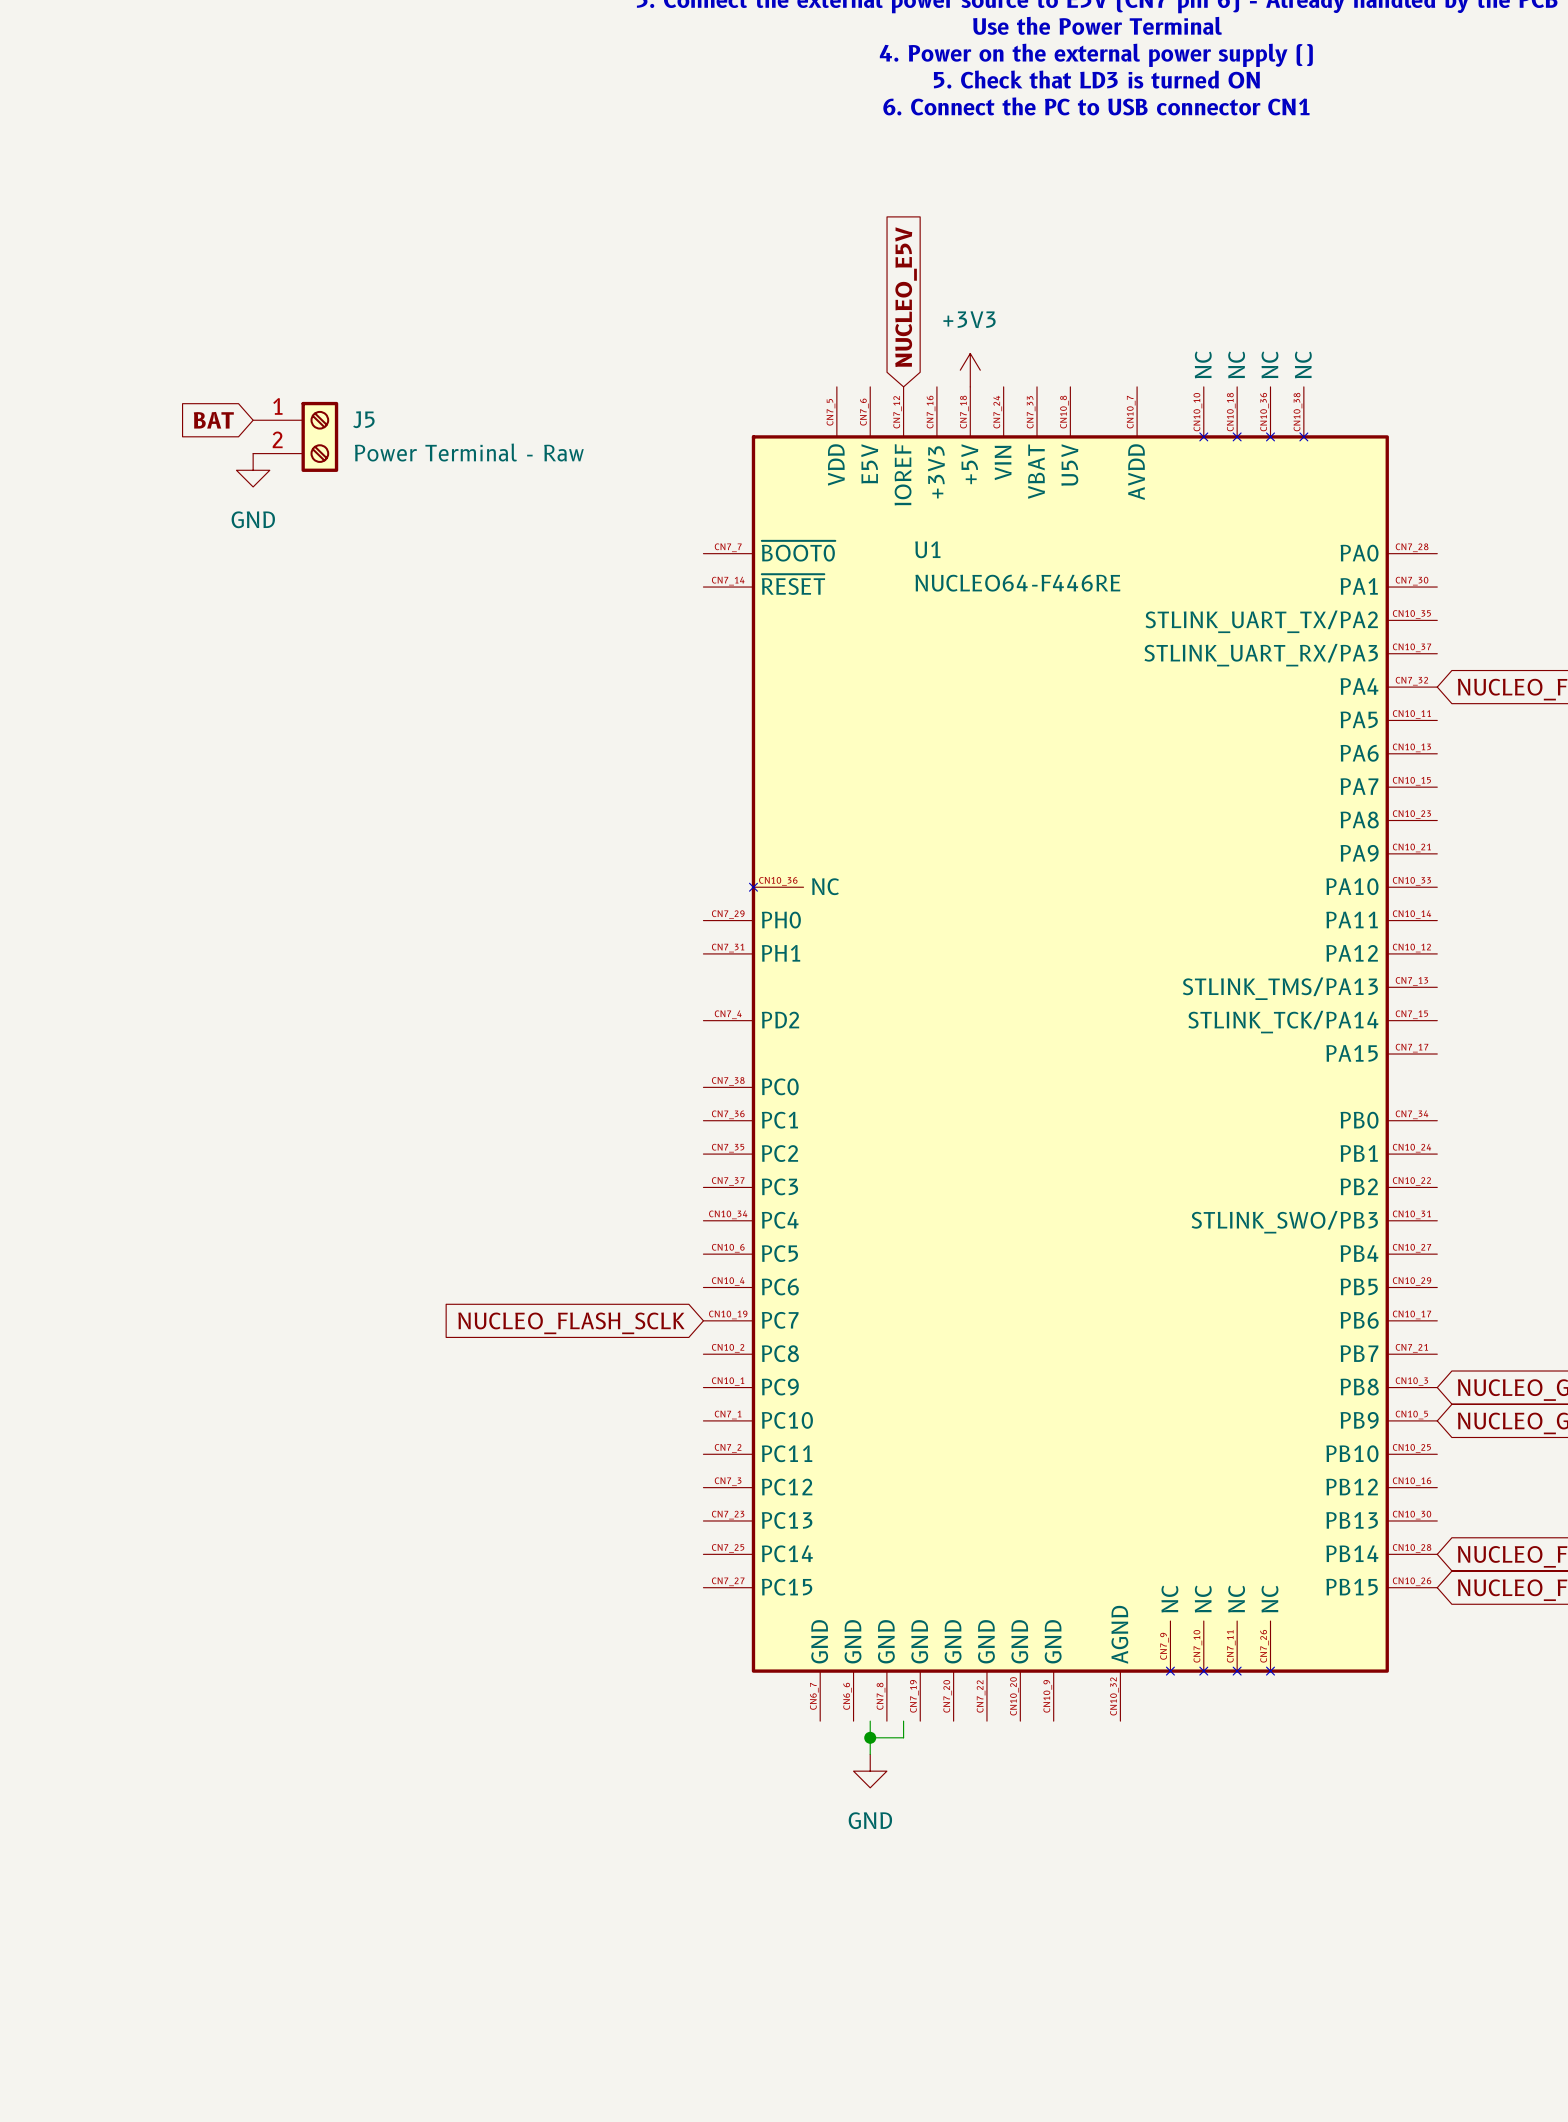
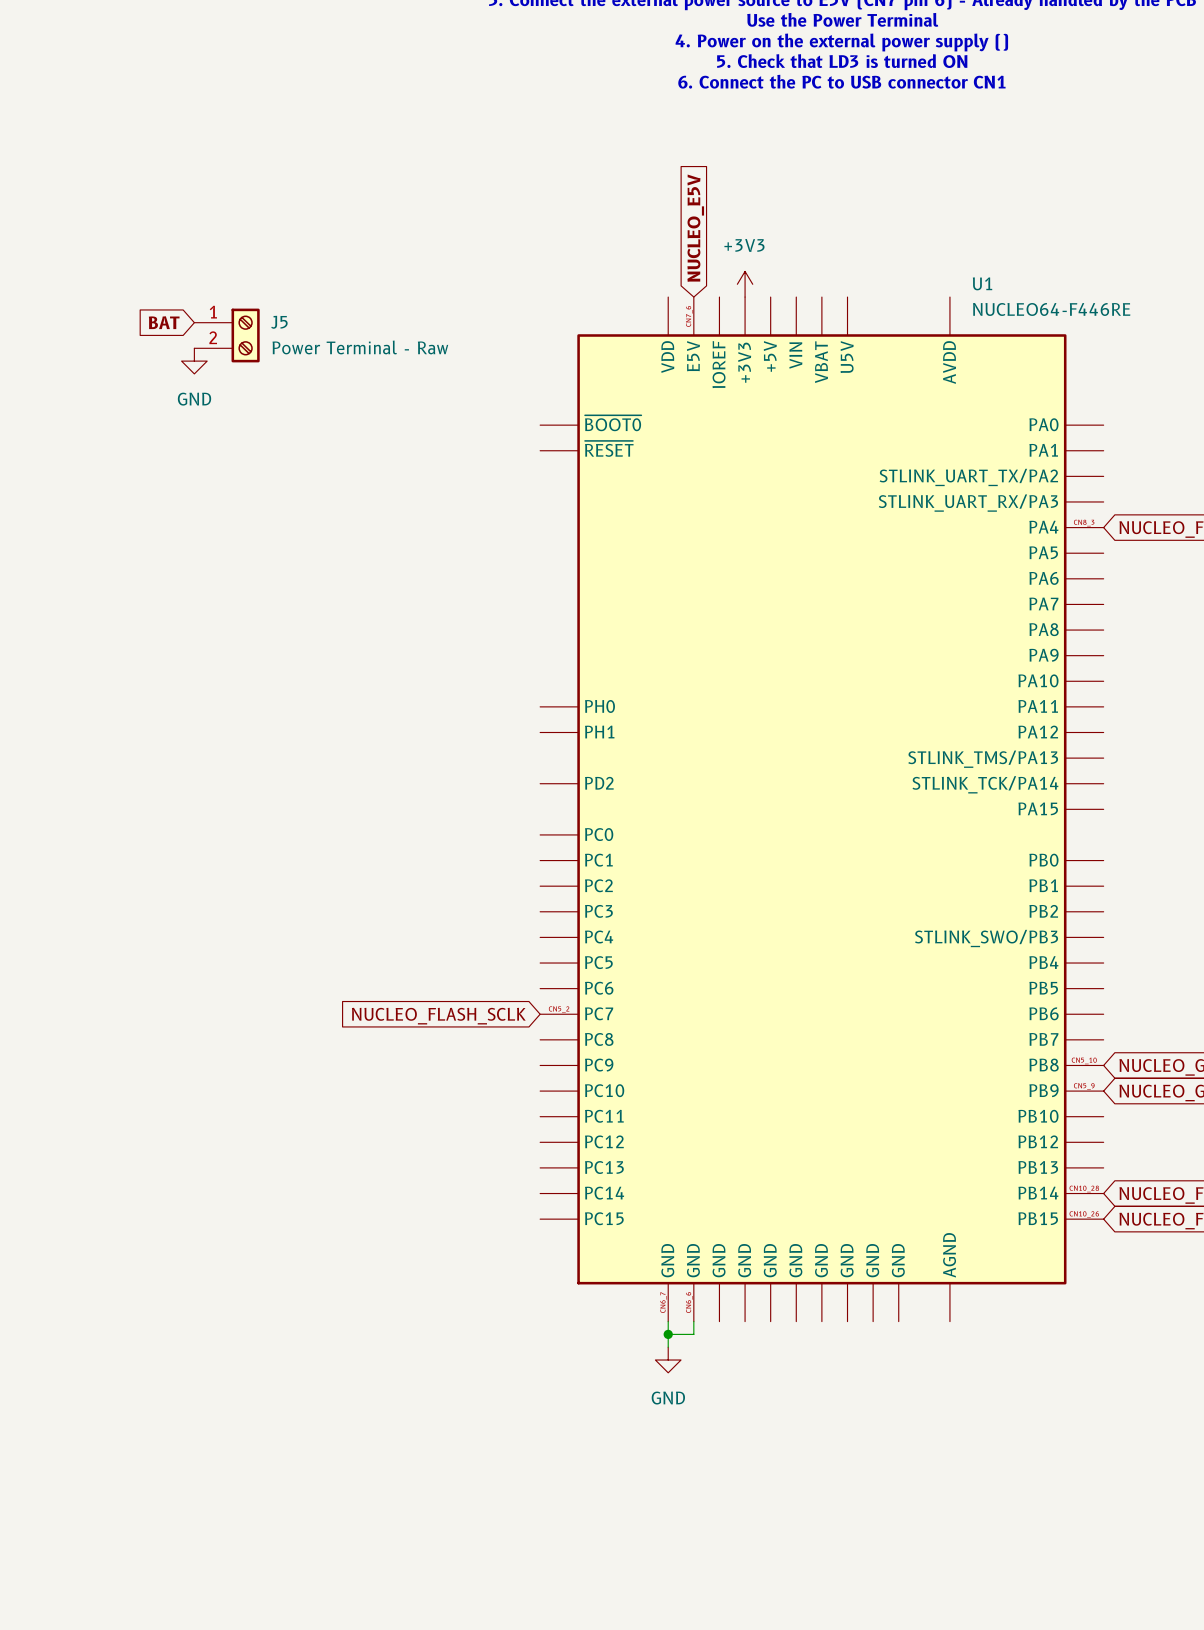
U1 symbol: [703, 386, 1438, 1722] -> [540, 297, 1104, 1322]
U1 name position: U1 (927, 549) -> U1 (982, 283)
U1 value position: NUCLEO64-F446RE (1017, 583) -> NUCLEO64-F446RE (1051, 309)

